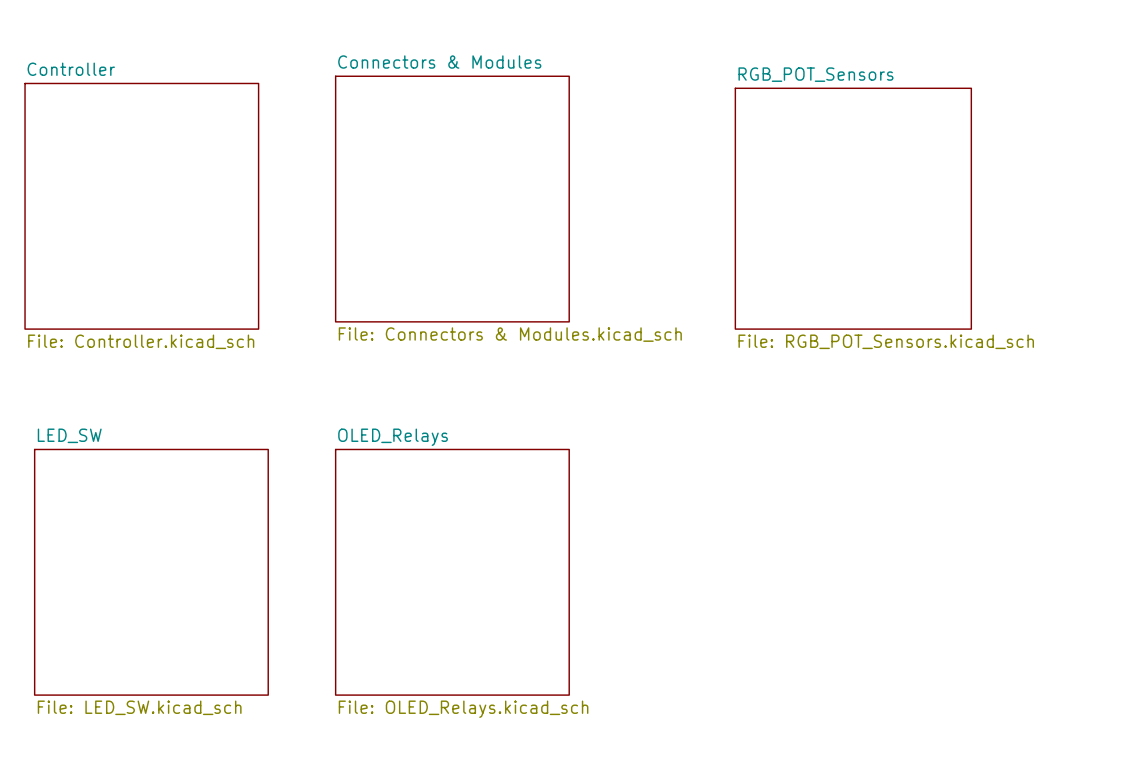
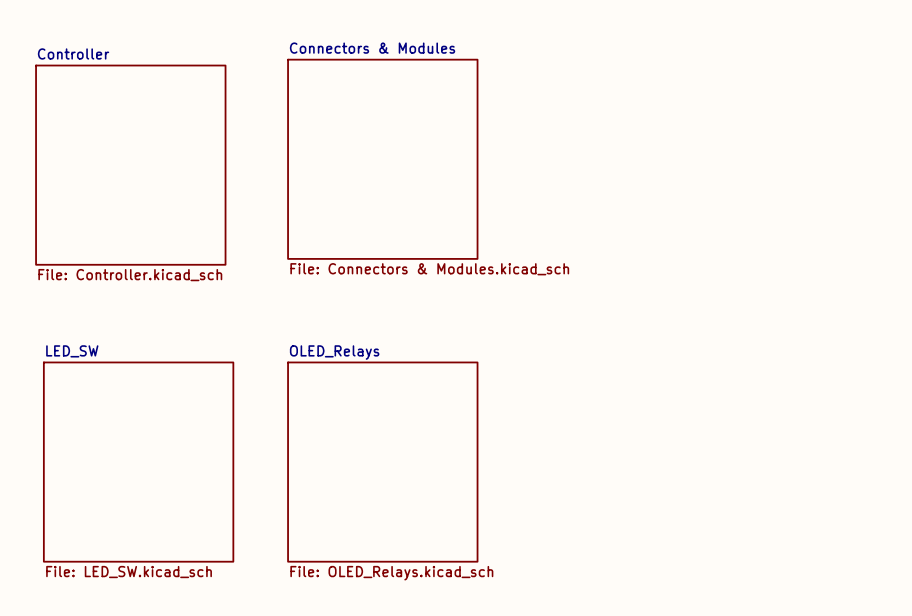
sheet RGB_POT_Sensors: File: RGB_POT_Sensors.kicad_sch (853, 208) -> none

